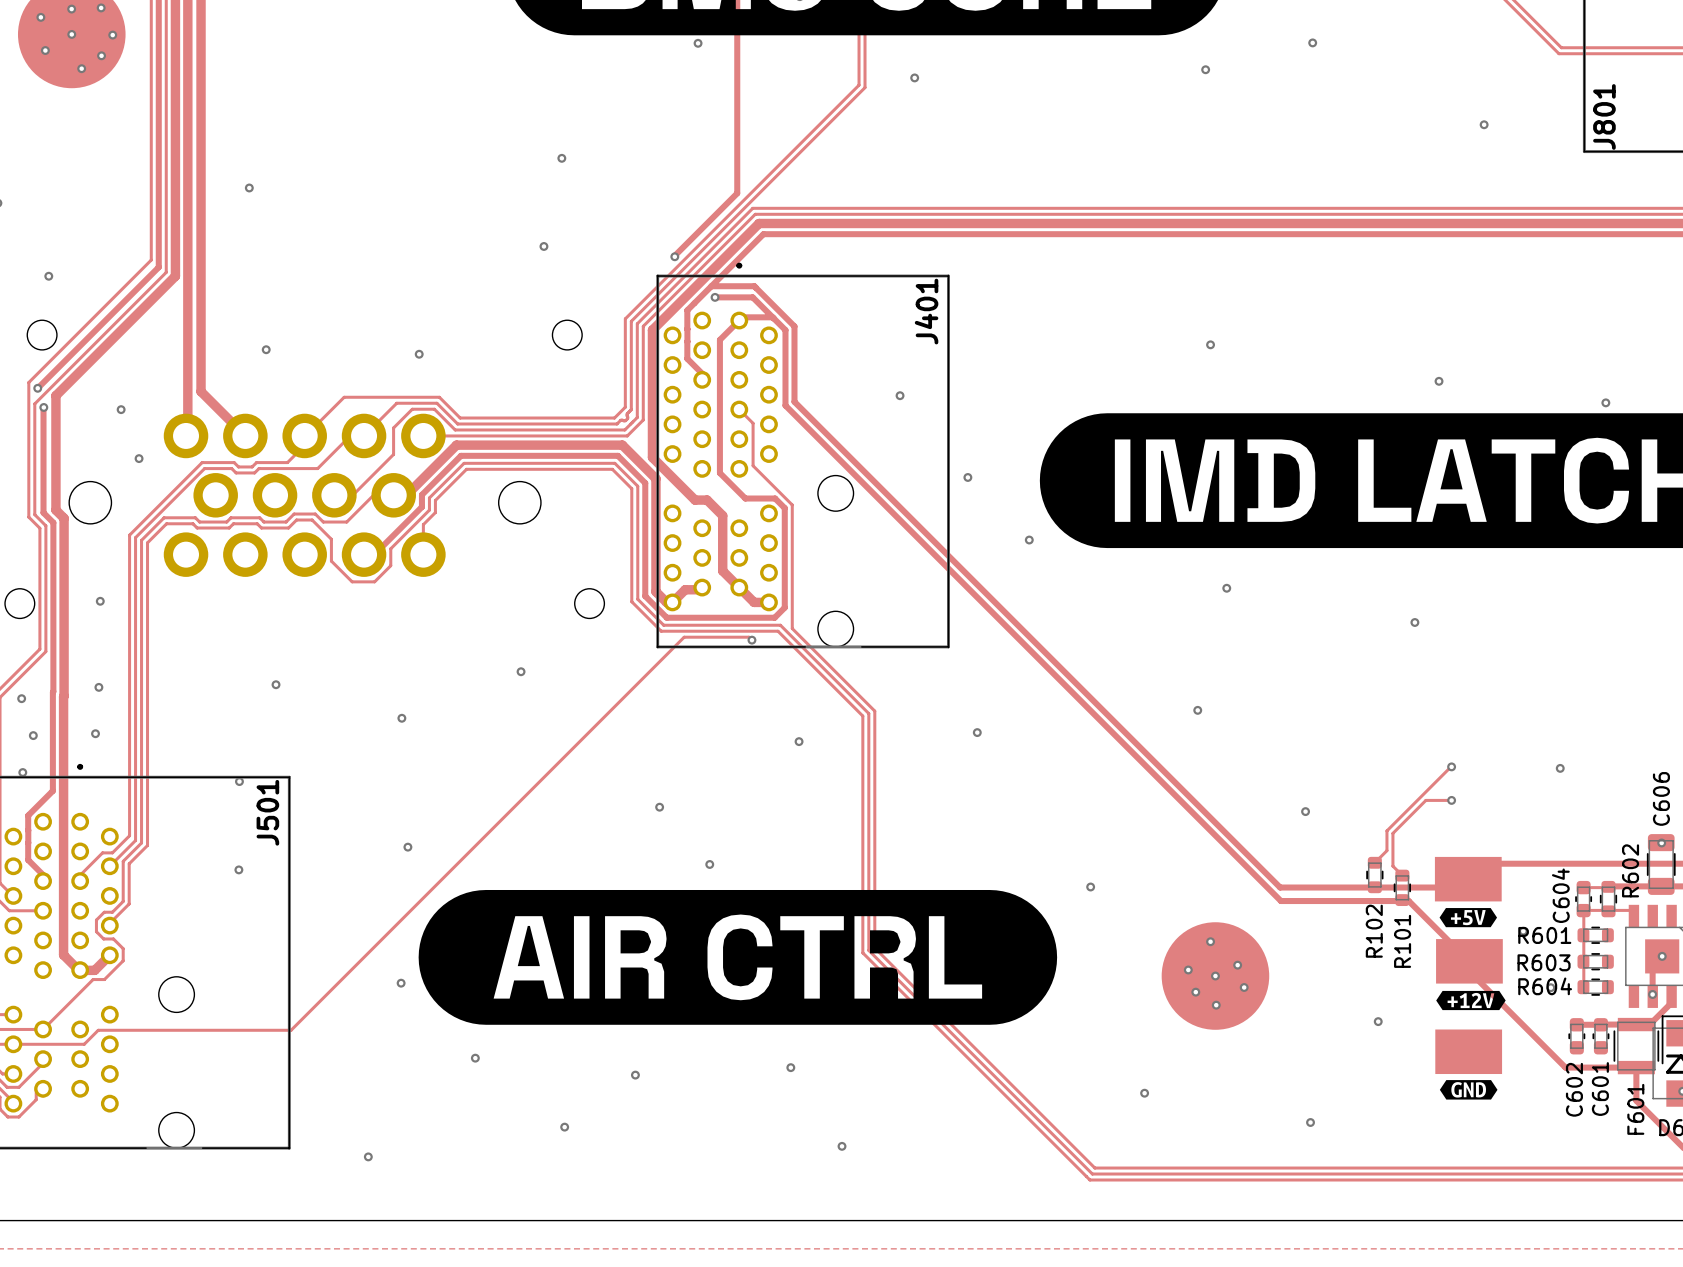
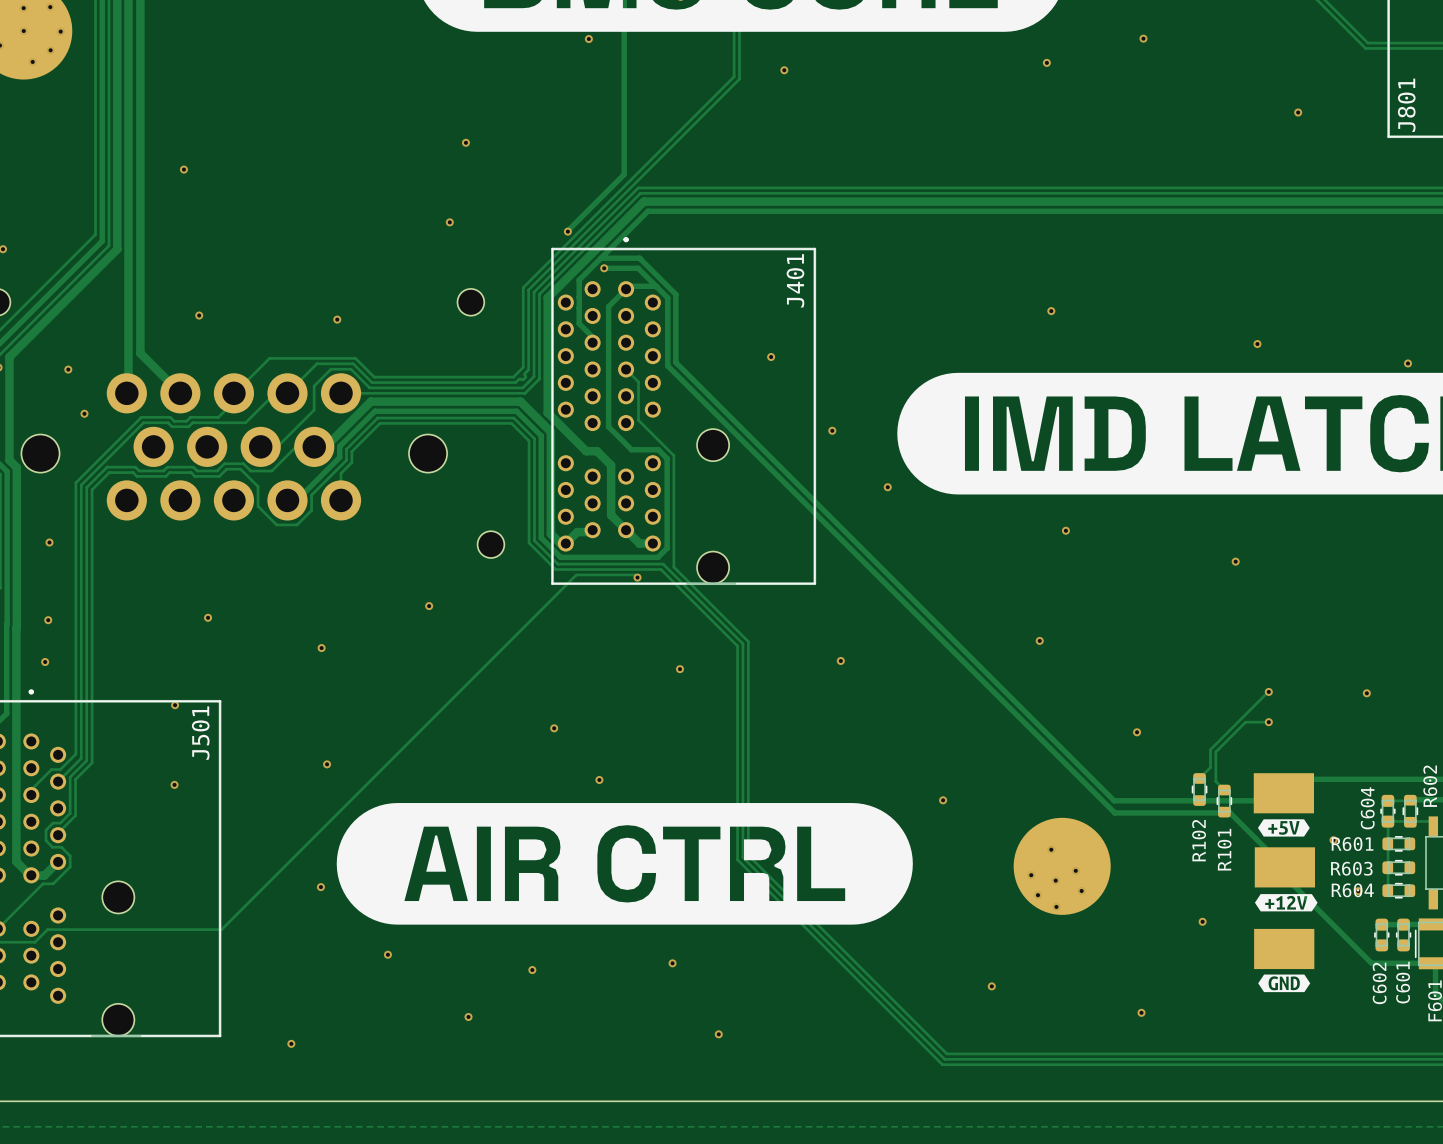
part position: (1215, 976) -> (1062, 866)

